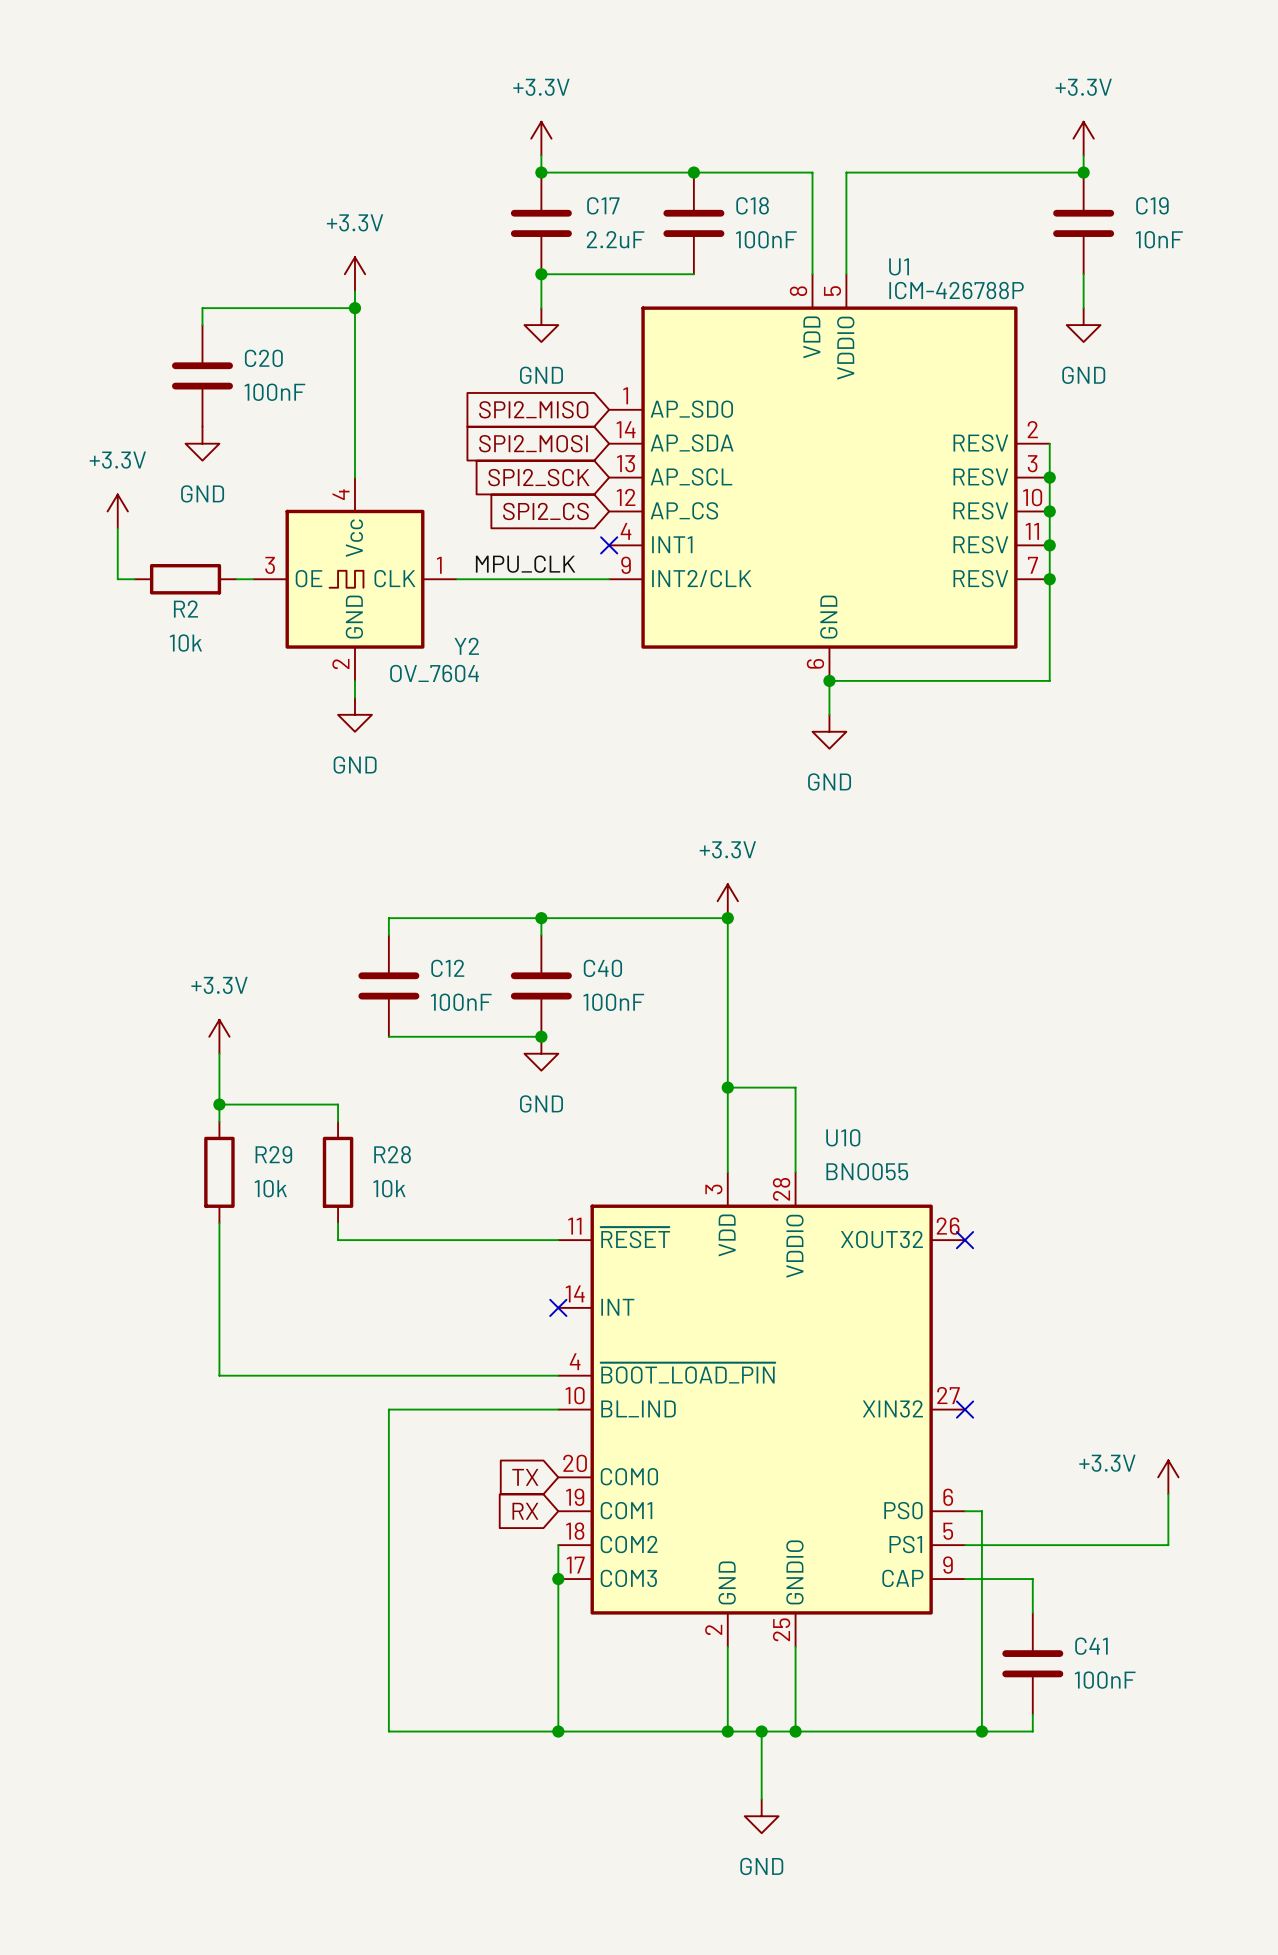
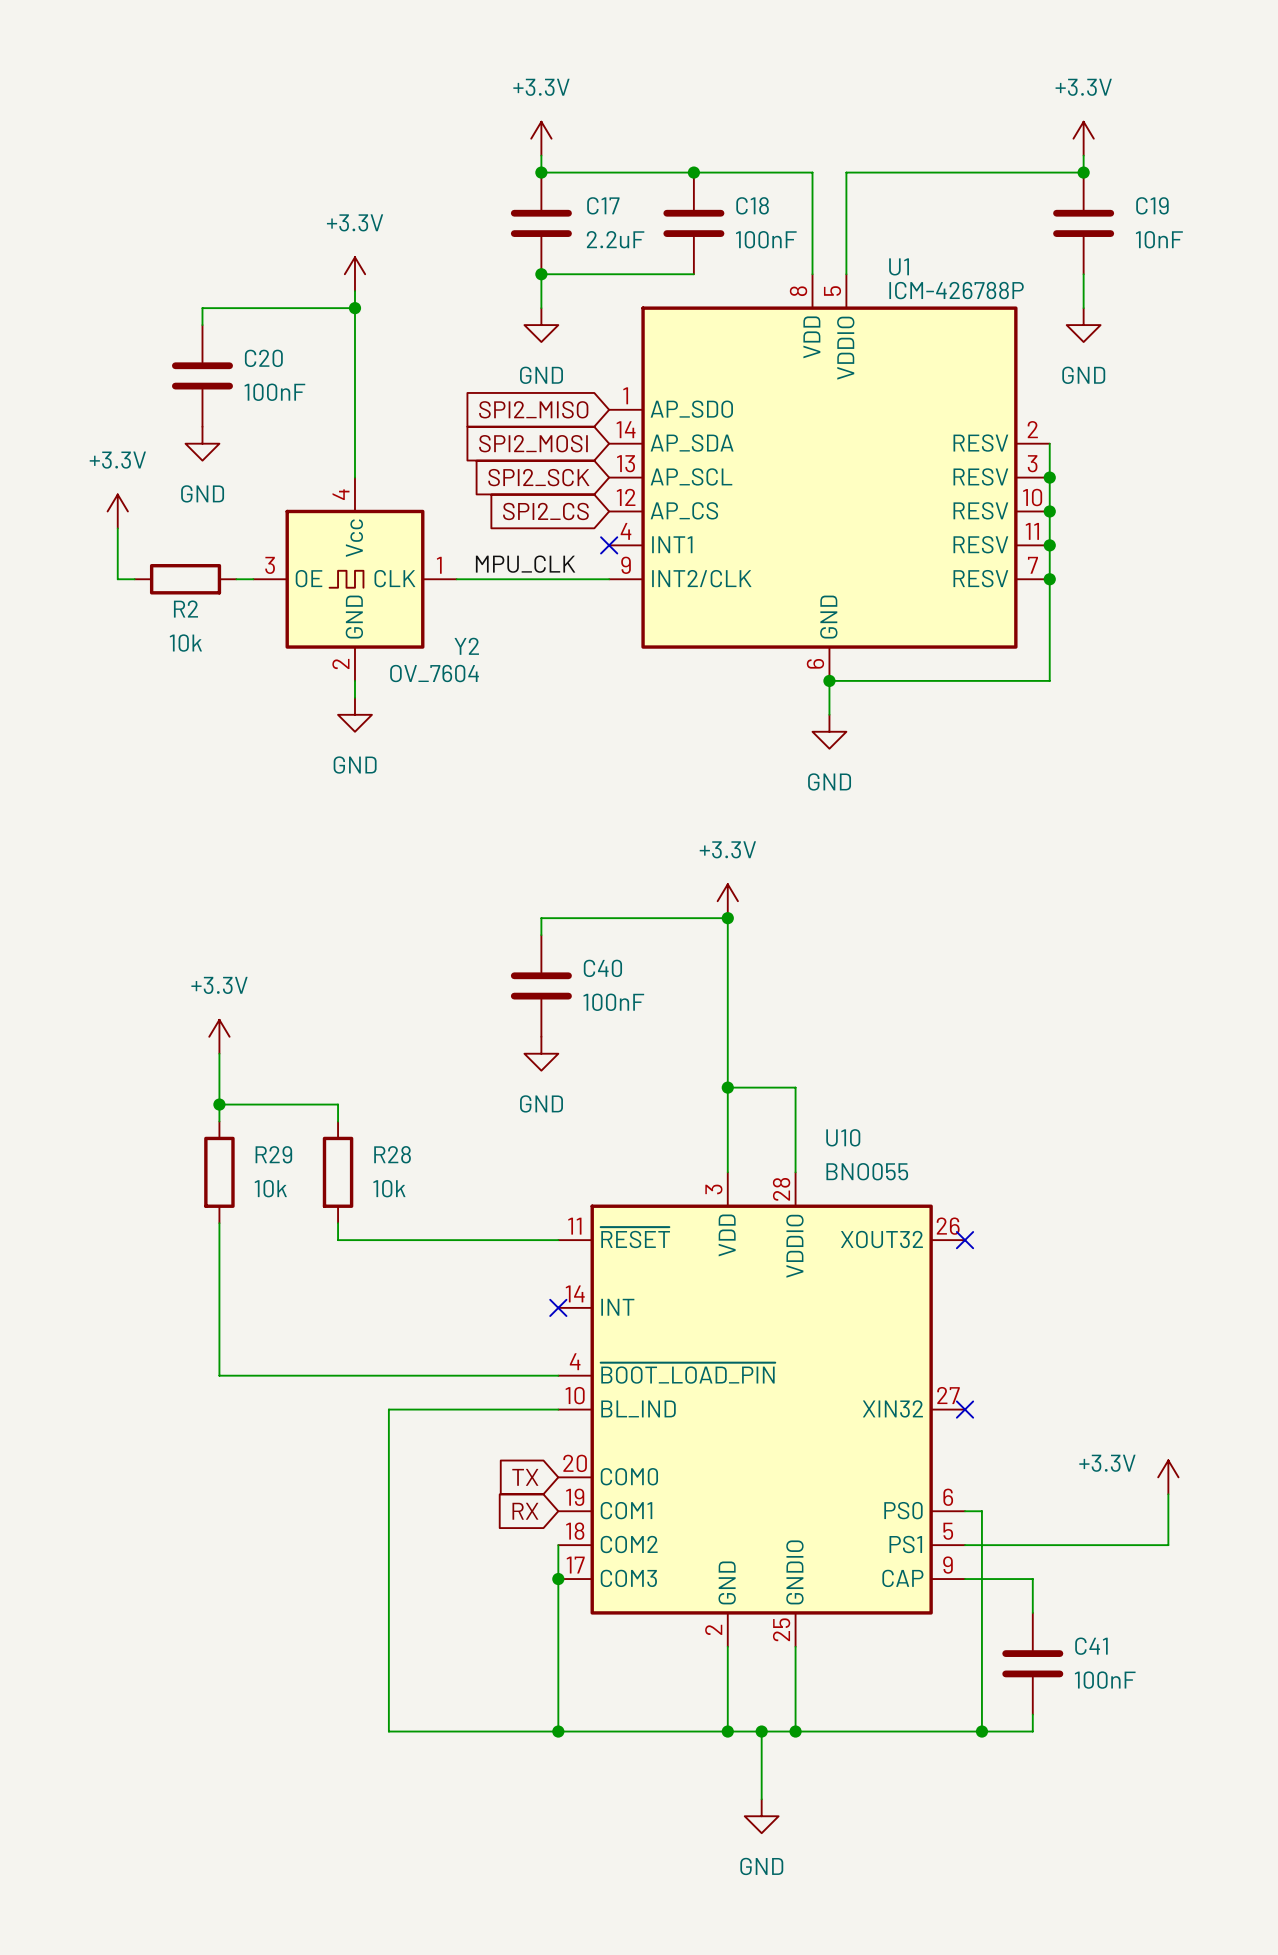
wire: (541, 918) (388, 918) (388, 935) -> none
junction: (541, 918) -> none
C12: 100nF (388, 985) -> none
wire: (388, 1036) (541, 1036) -> none
junction: (541, 1036) -> none

